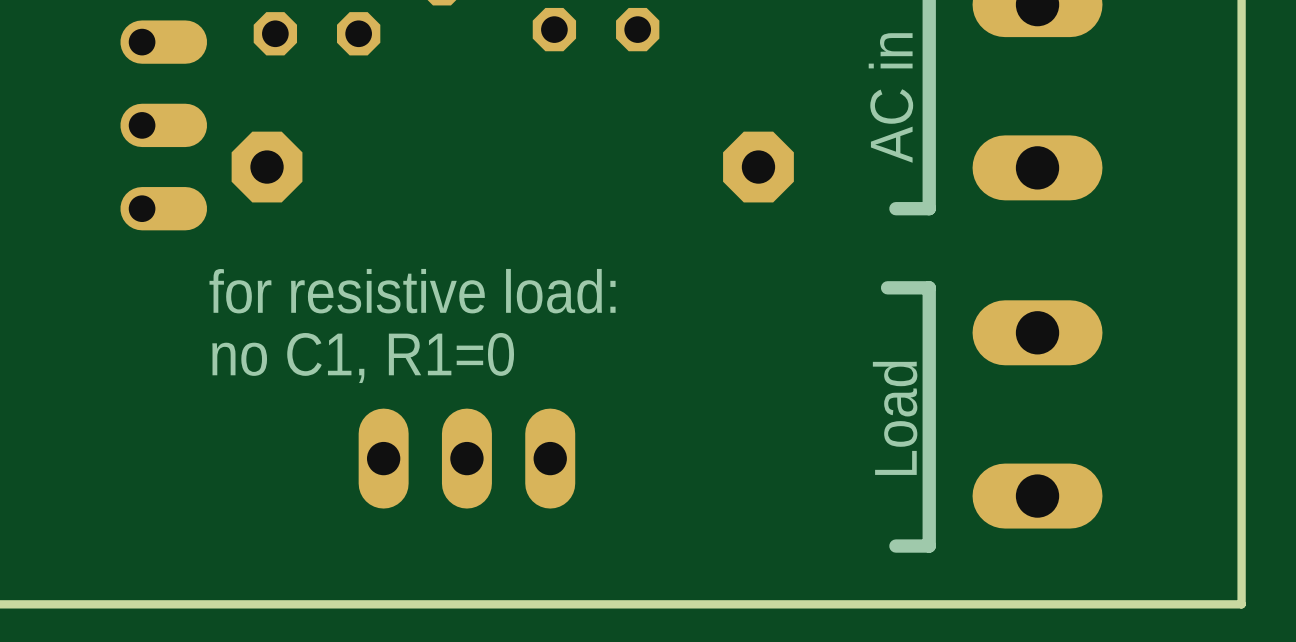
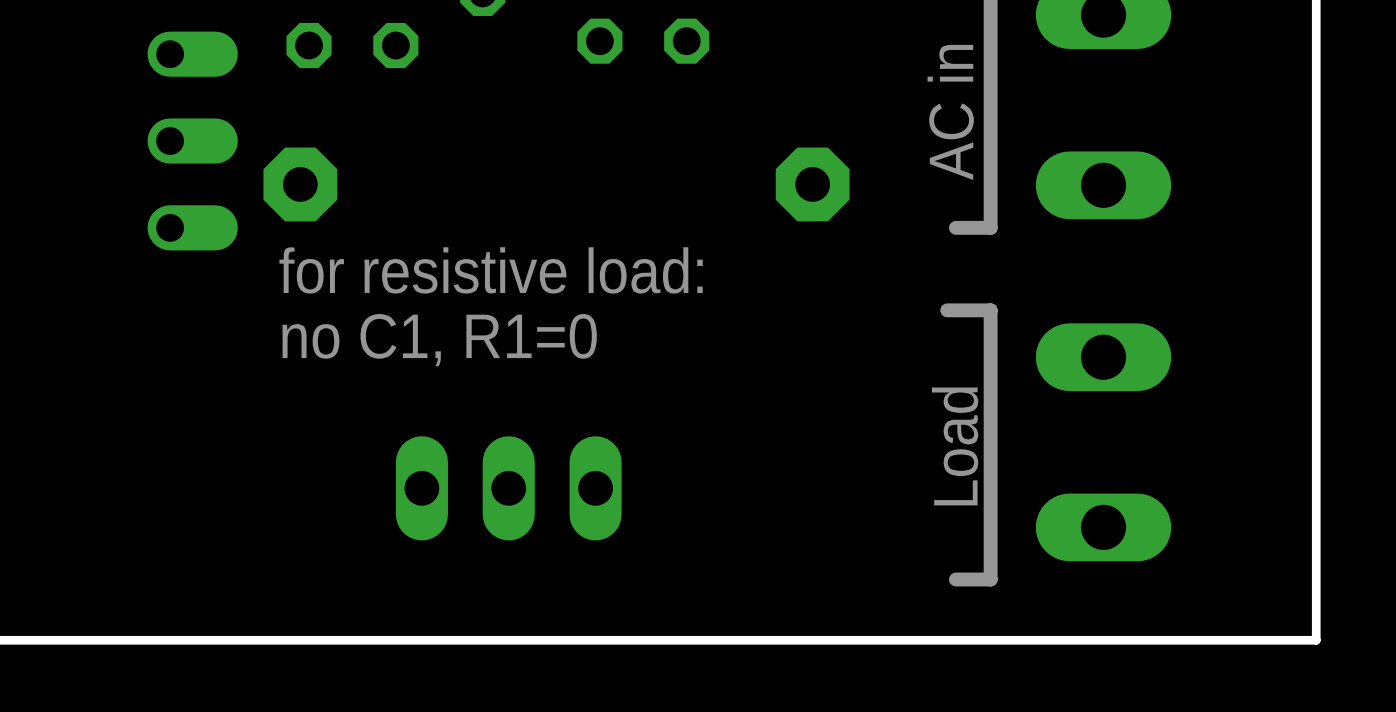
text position: for resistive load: (412, 291) -> for resistive load: (491, 270)
text position: no C1, R1=0 (363, 358) -> no C1, R1=0 (439, 340)

